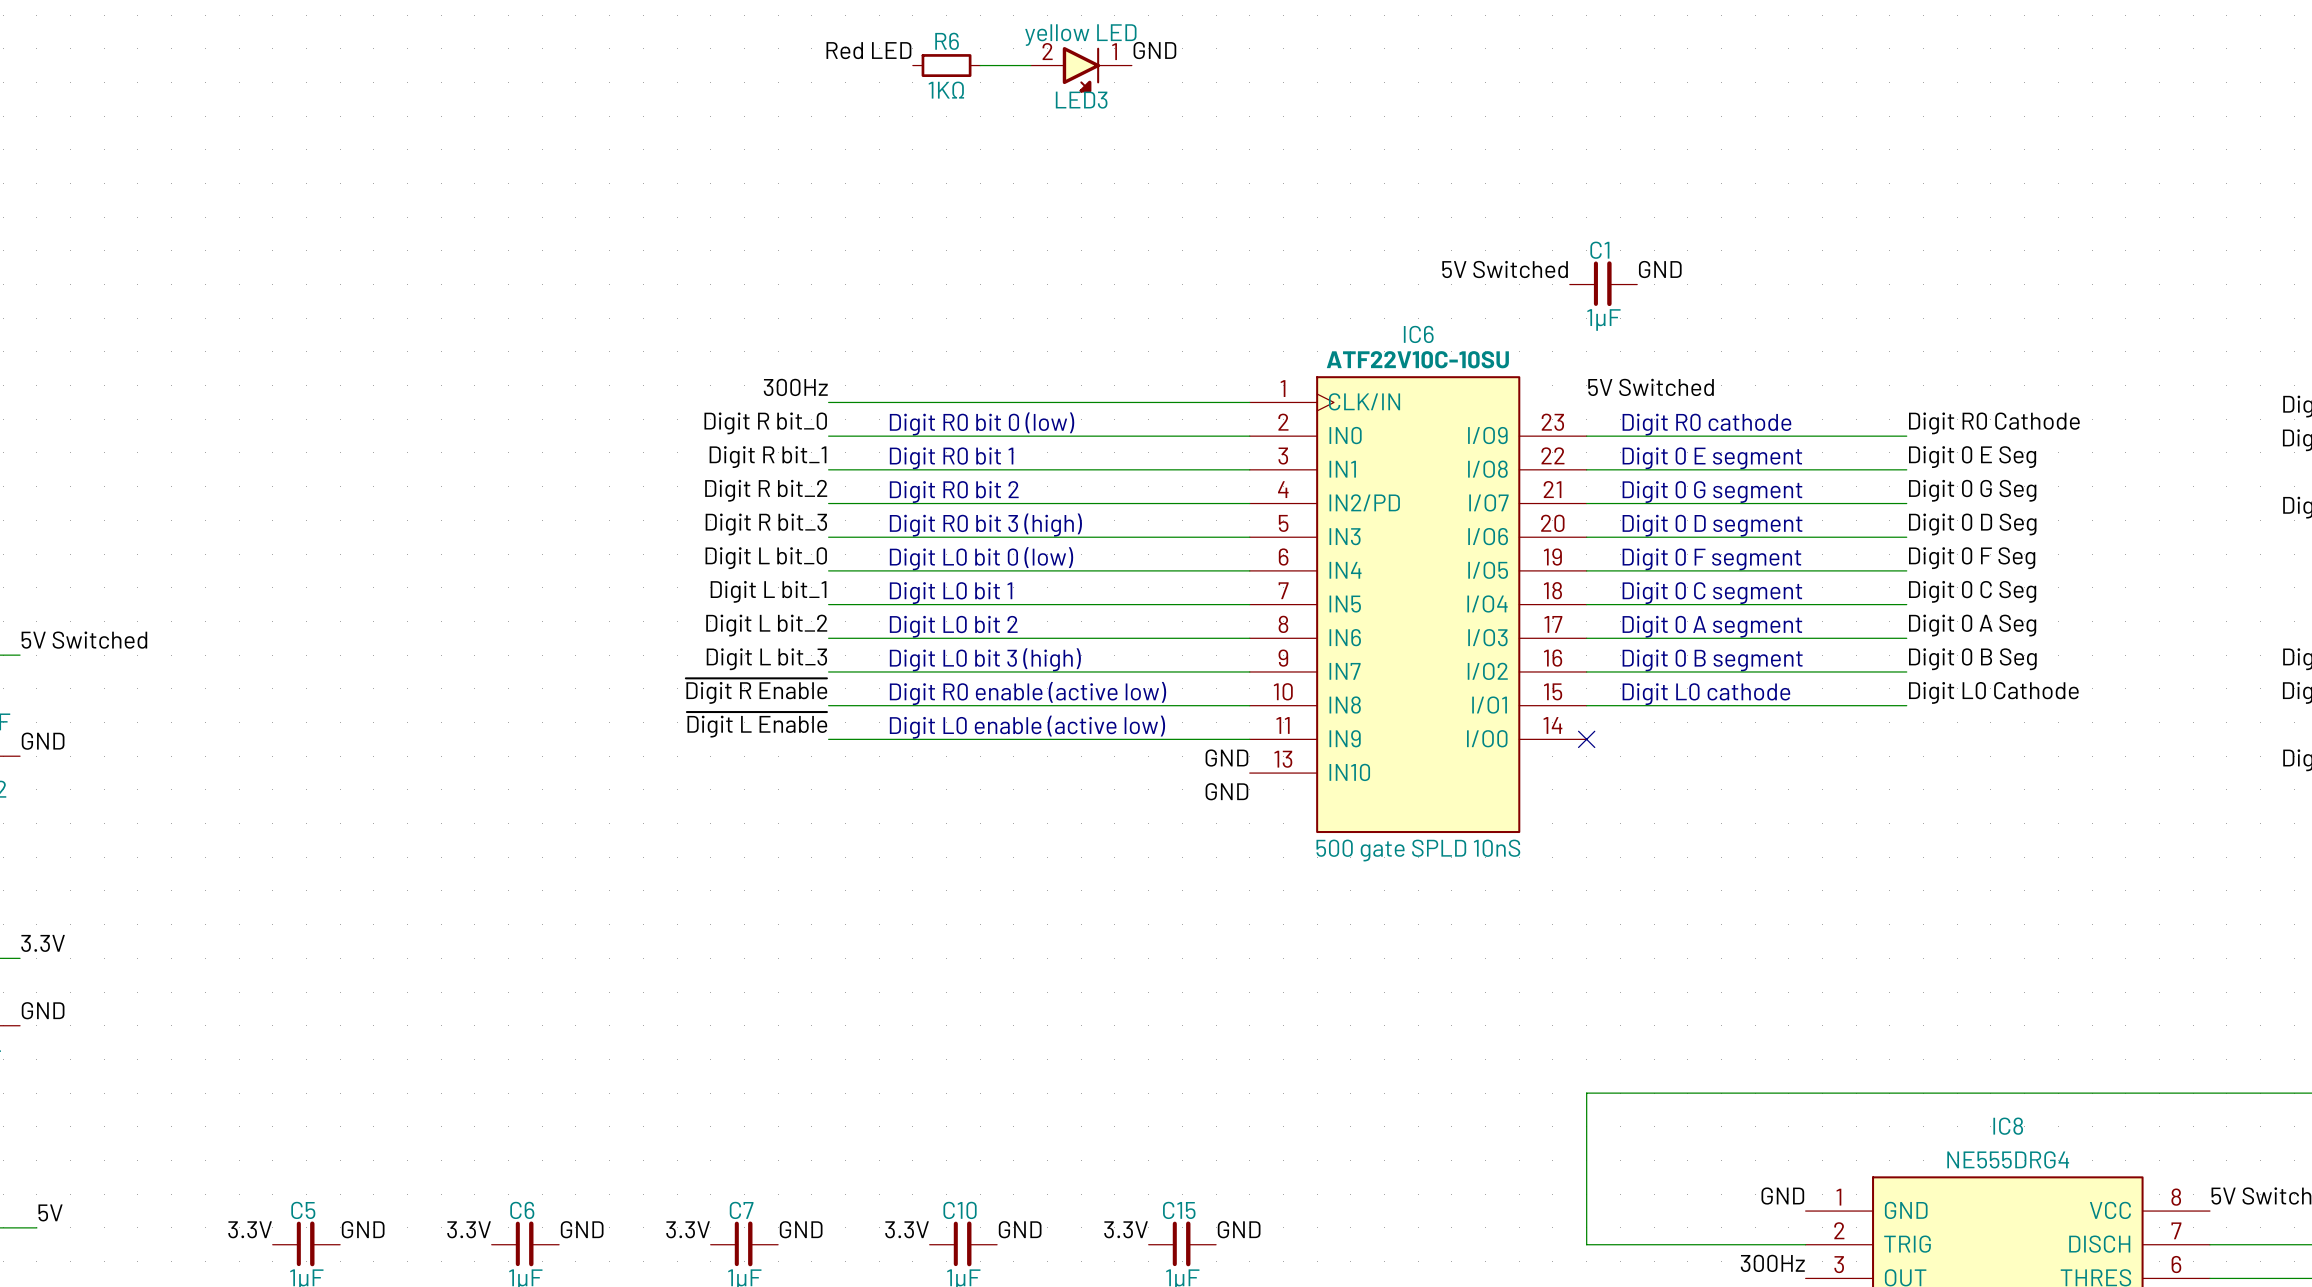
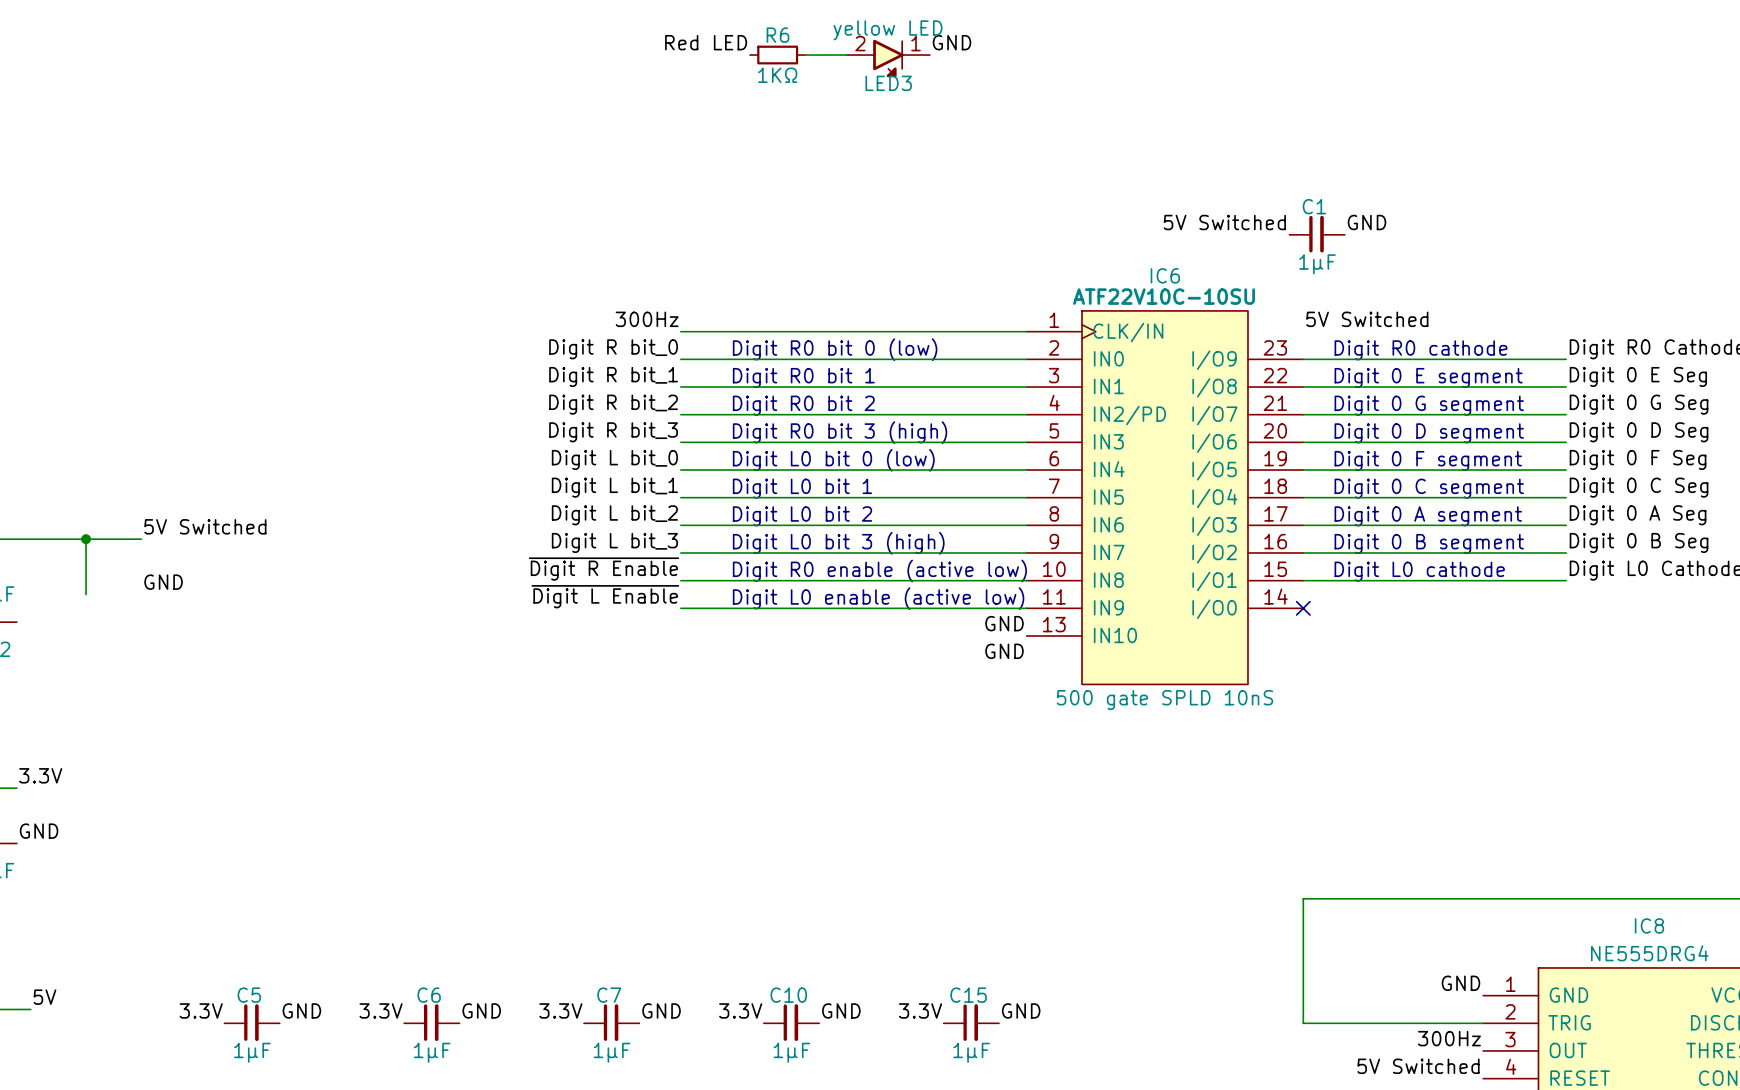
label position: 5V Switched (84, 640) -> 5V Switched (205, 526)
wire: none -> (16, 539) (141, 539)
wire: none -> (86, 539) (86, 594)
junction: none -> (86, 539)
label position: GND (43, 741) -> GND (163, 582)

